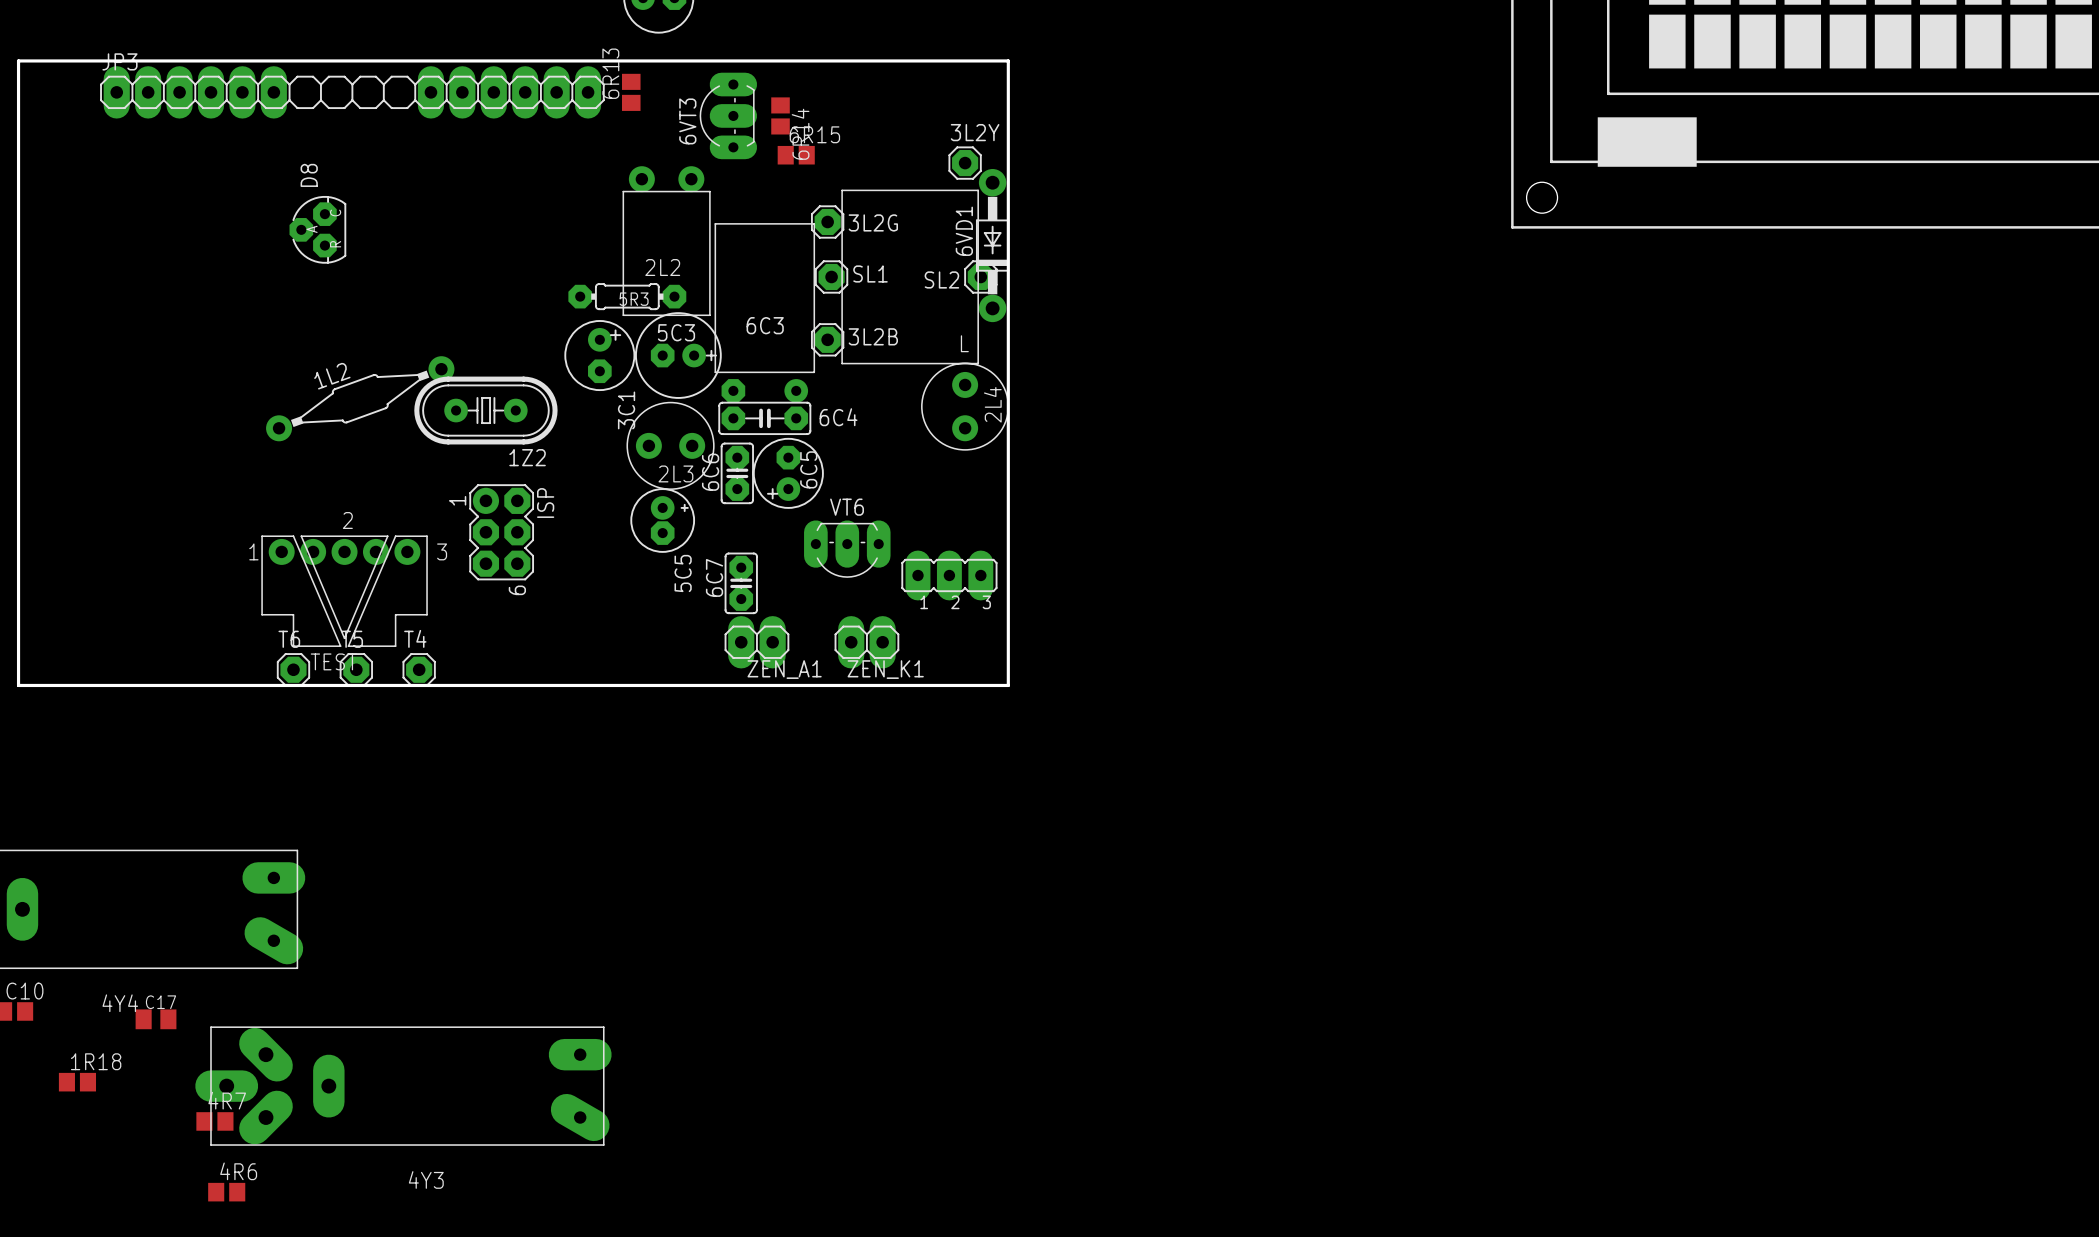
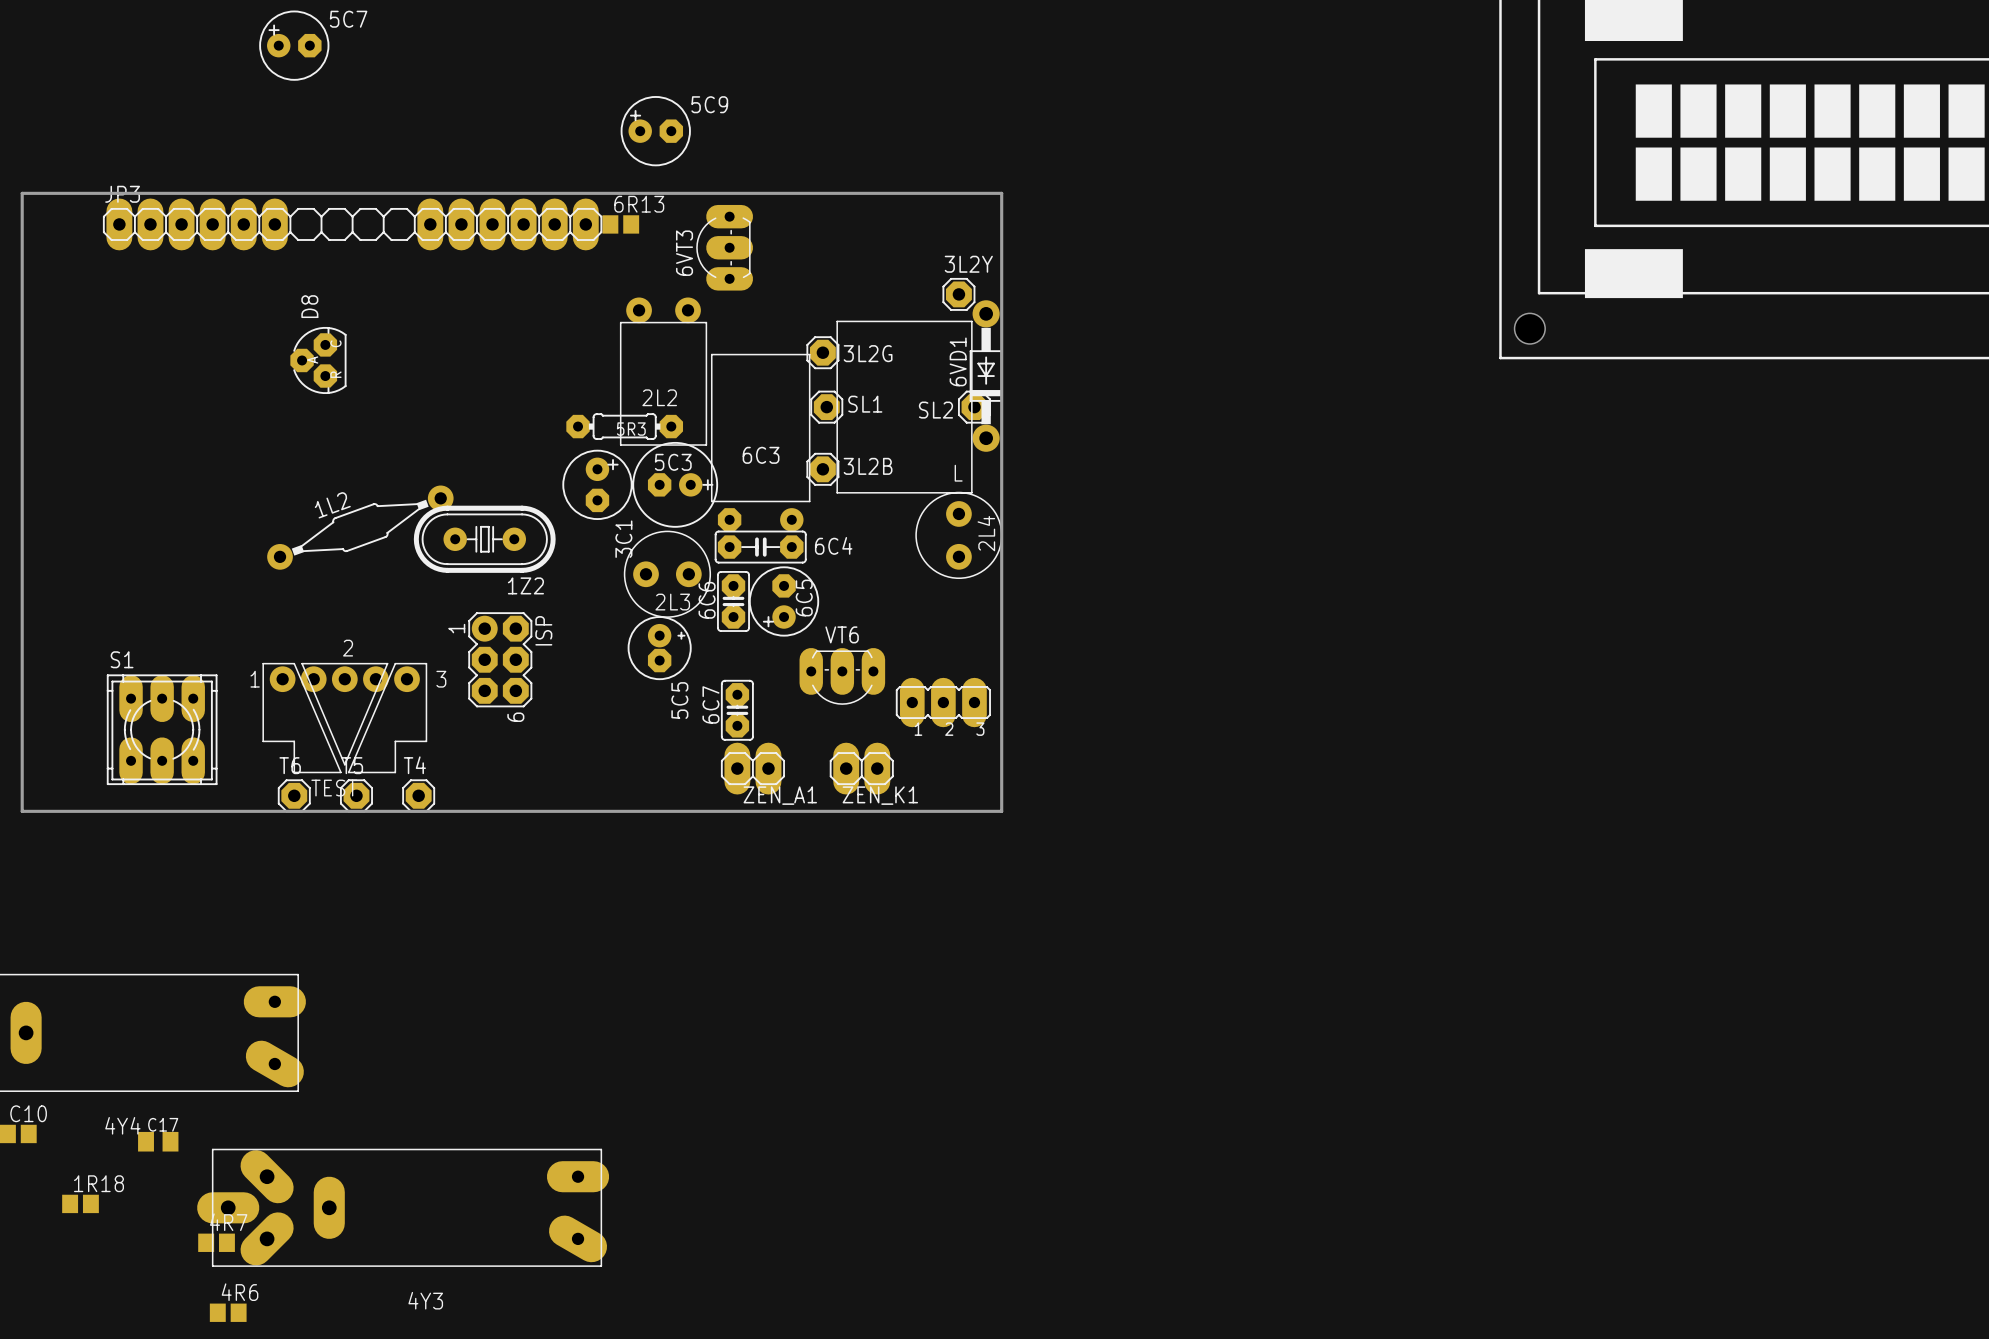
6R13 rotation: 0° (631, 92) -> 90° clockwise (620, 224)
6R14: (780, 115) -> none
6R15: (796, 155) -> none
S1: none -> (162, 729)

